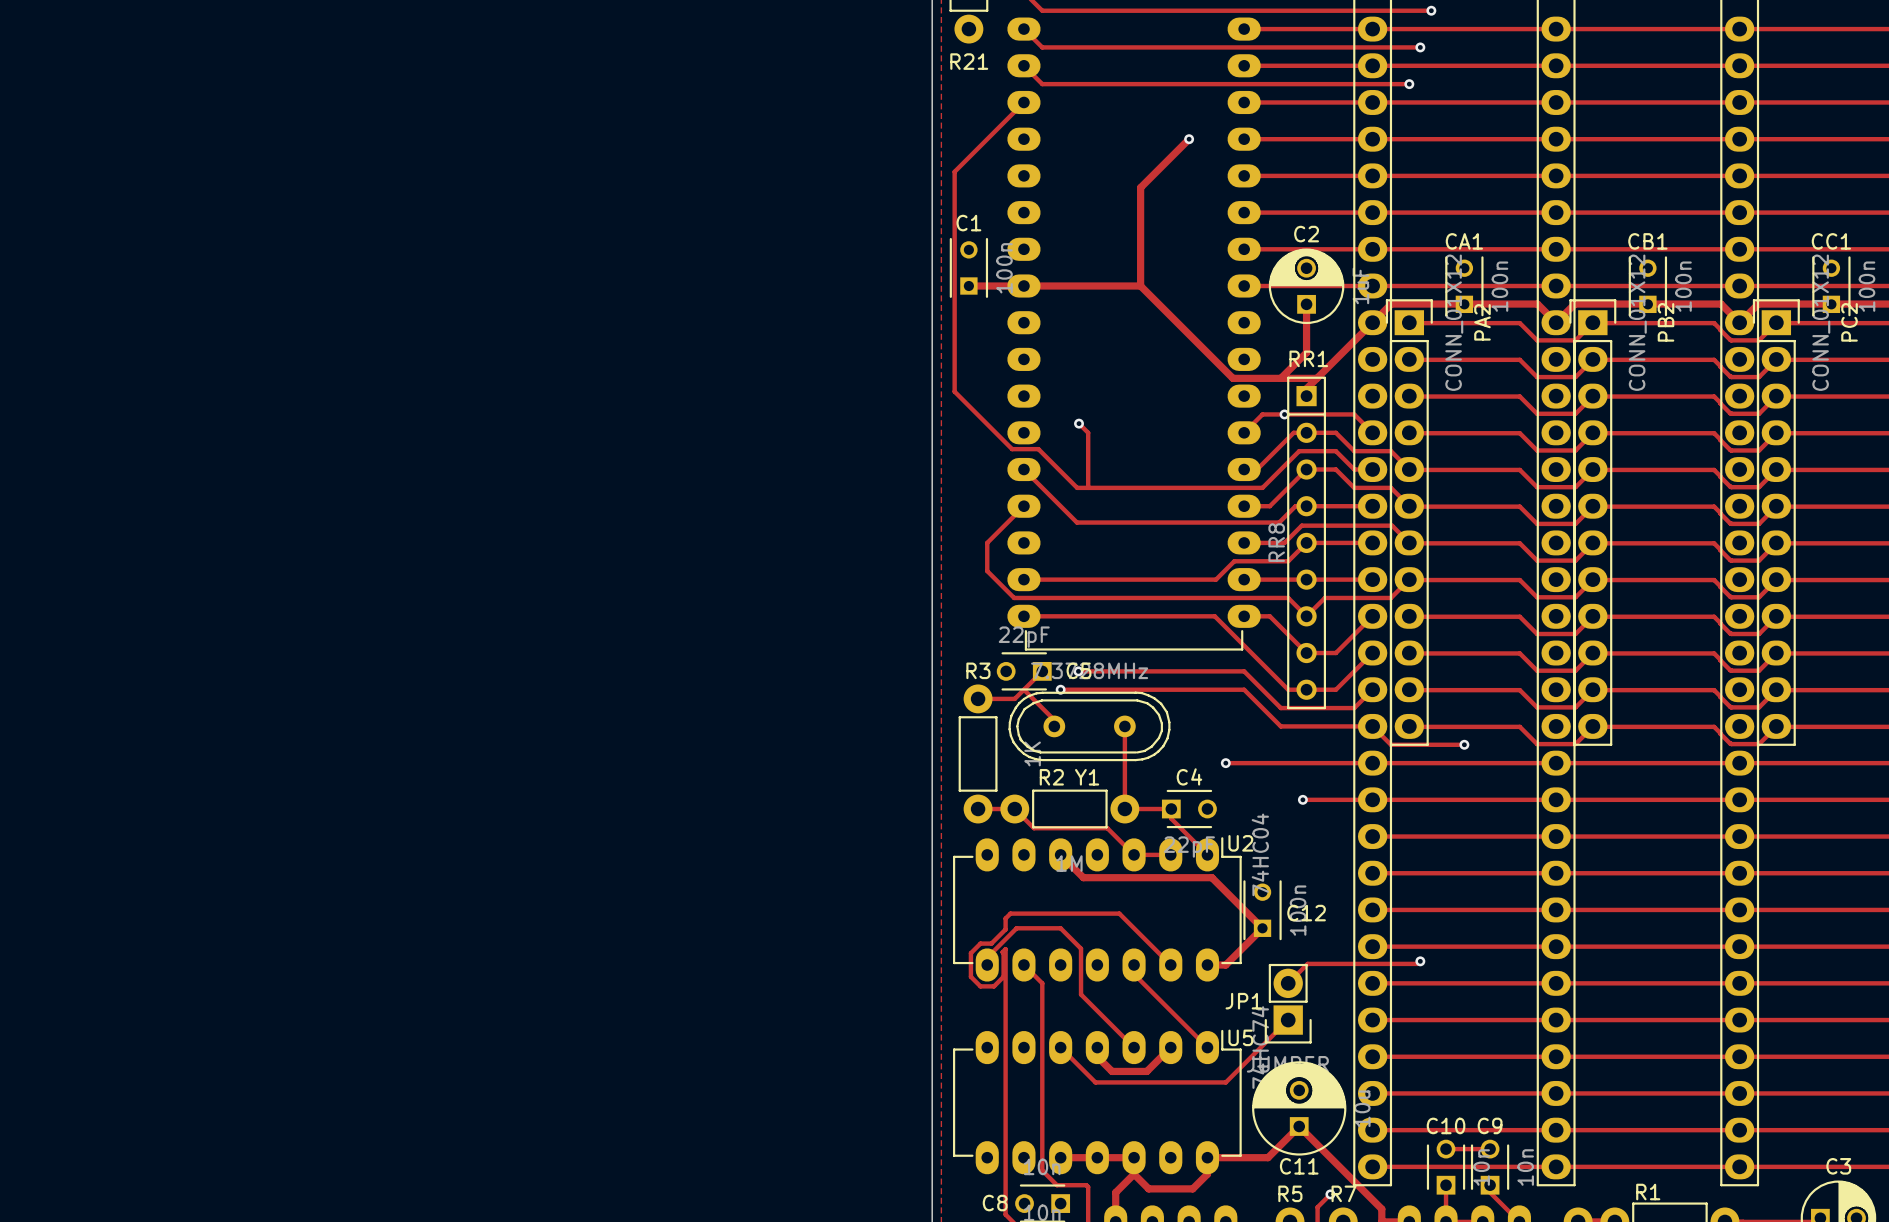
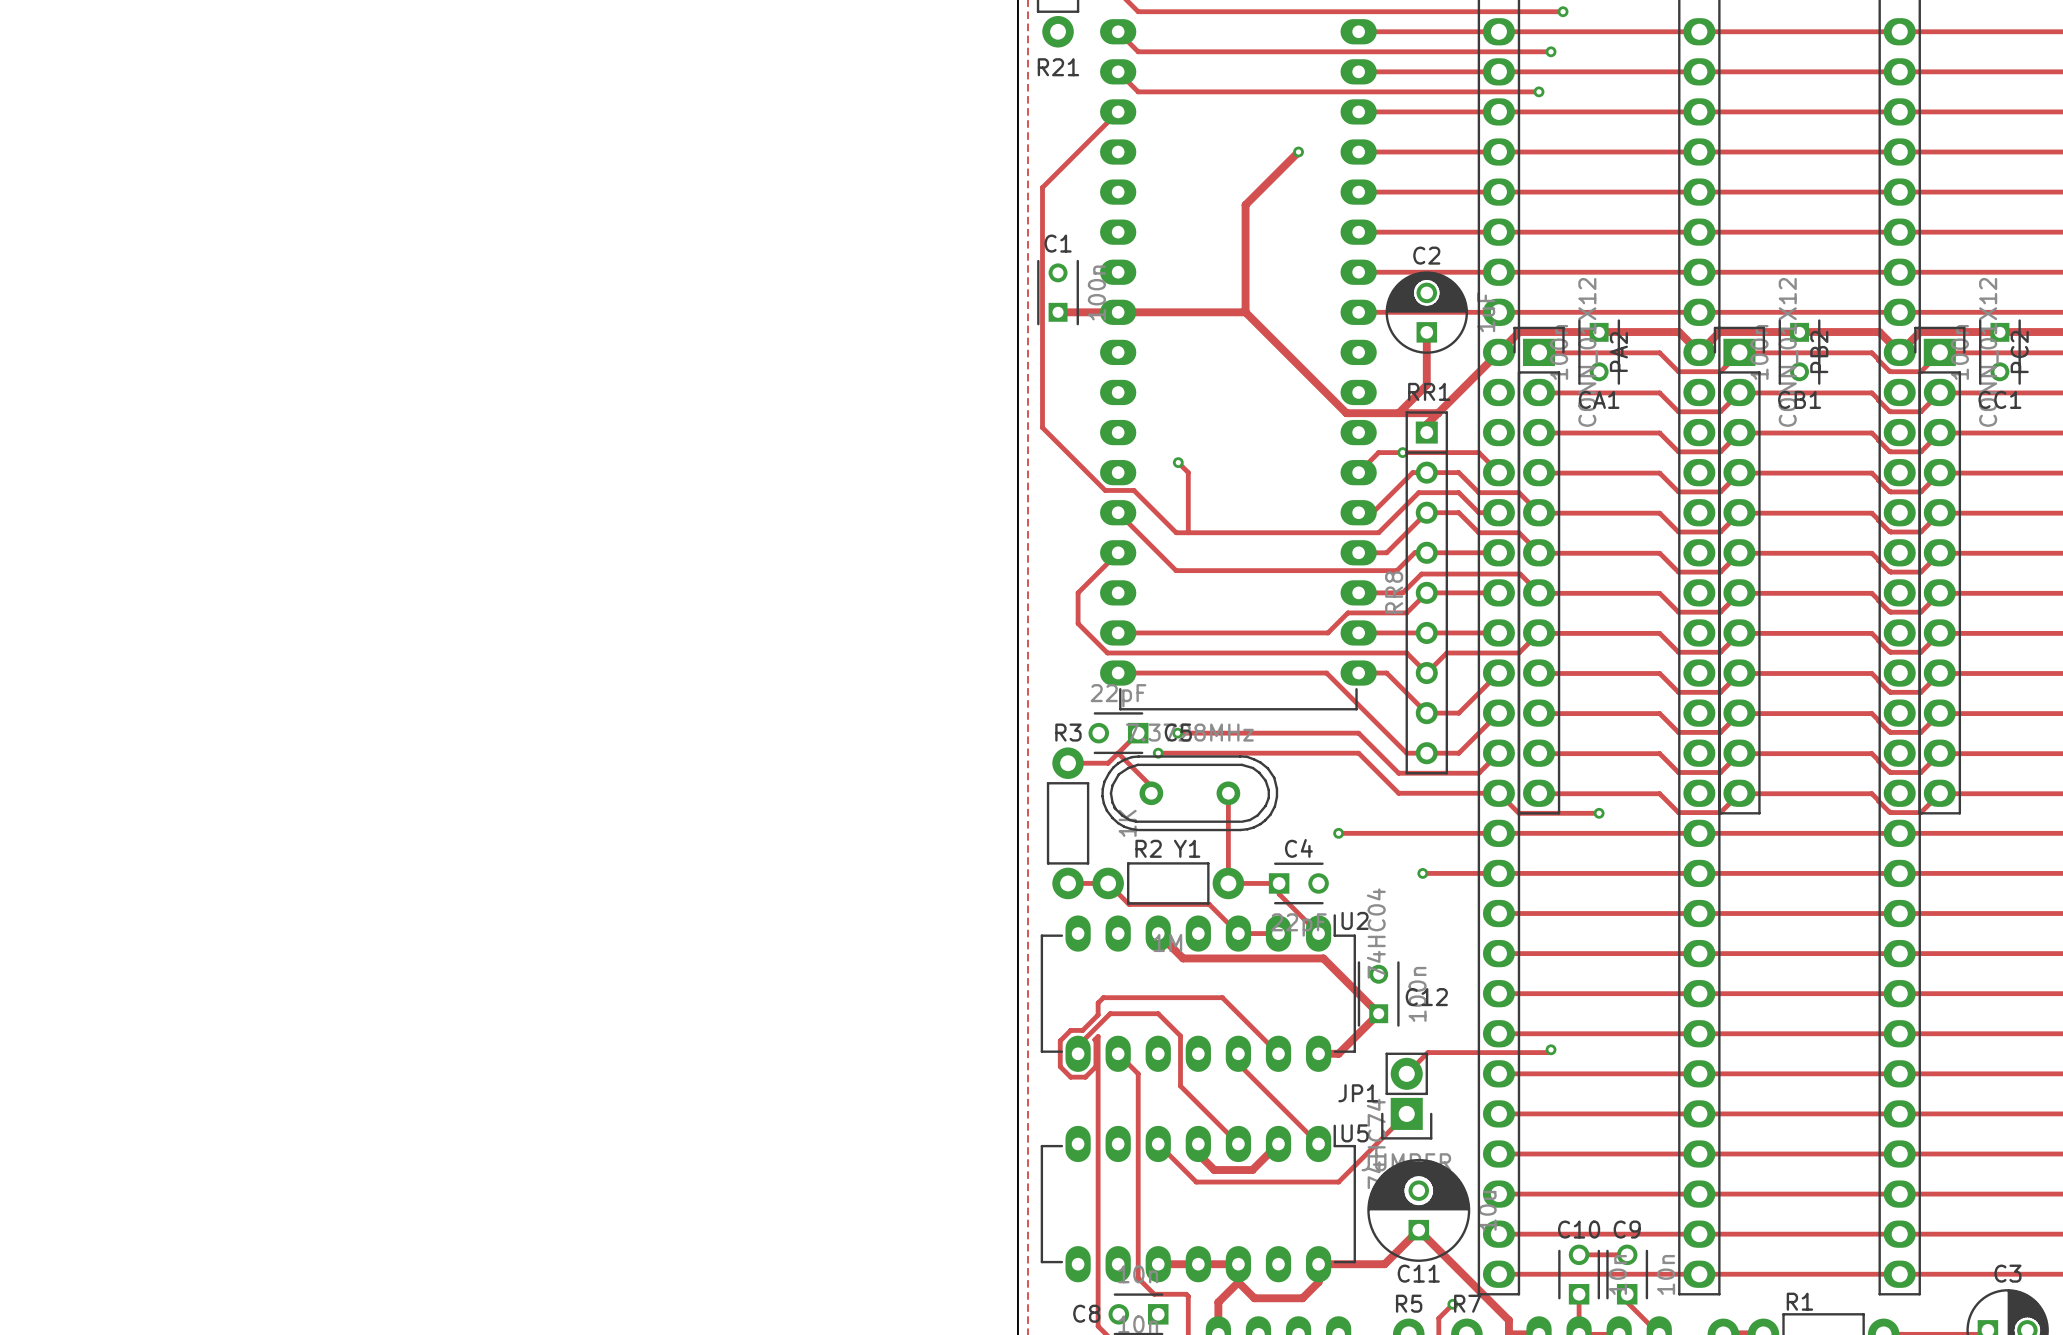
CA1 rotation: 0° (1464, 286) -> 180° (1599, 352)
CA1 position: (1464, 286) -> (1599, 352)
CB1 rotation: 0° (1647, 286) -> 180° (1799, 352)
CB1 position: (1647, 286) -> (1799, 352)
CC1 rotation: 0° (1831, 286) -> 180° (1999, 352)
CC1 position: (1831, 286) -> (1999, 352)

